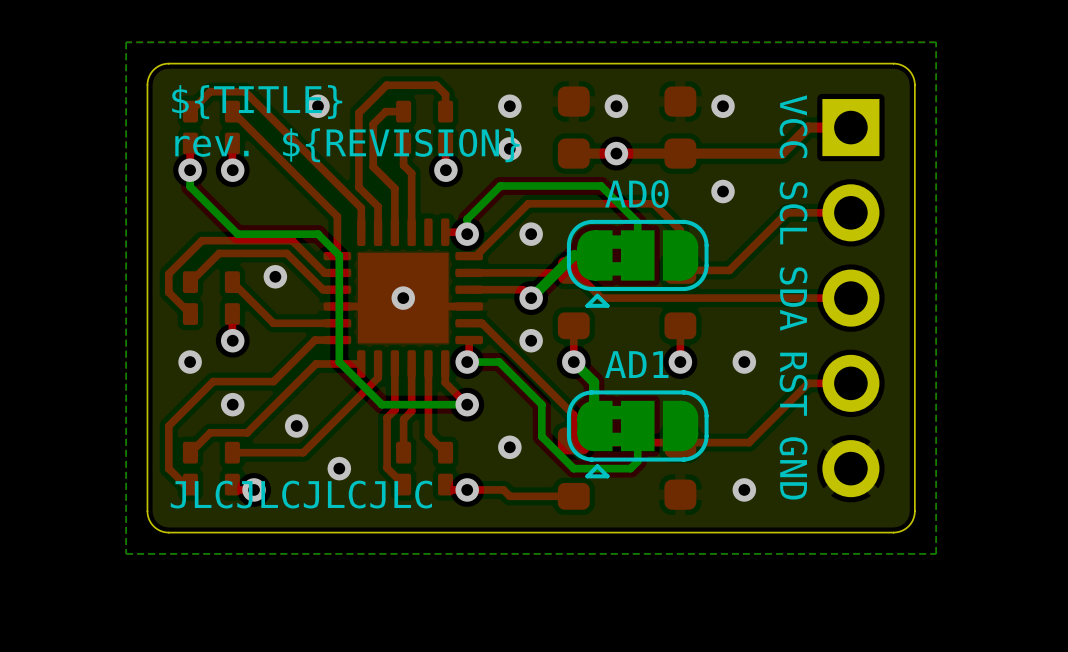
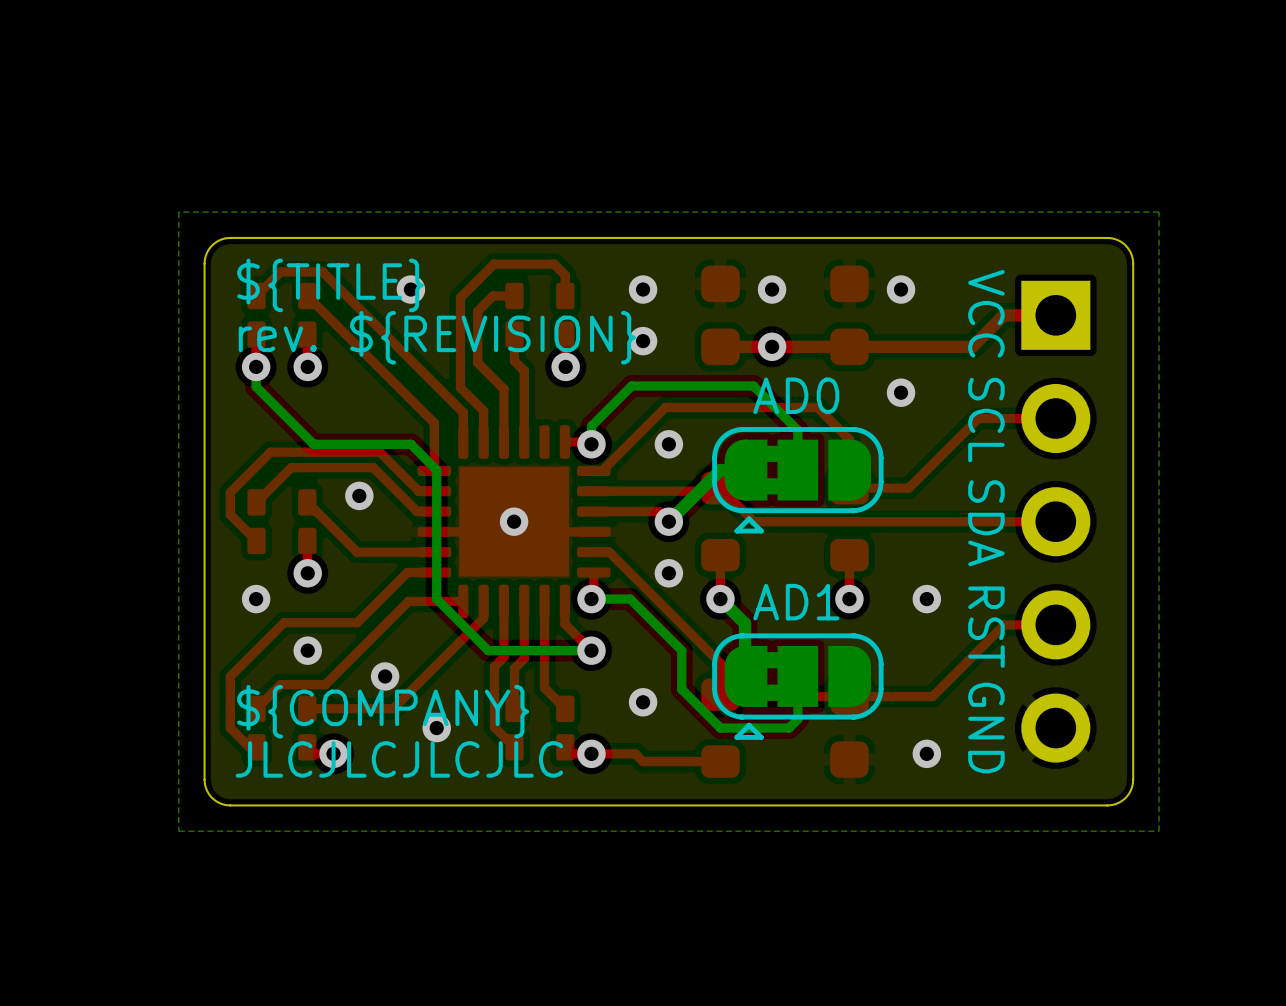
text: none -> ${COMPANY} (383, 711)

